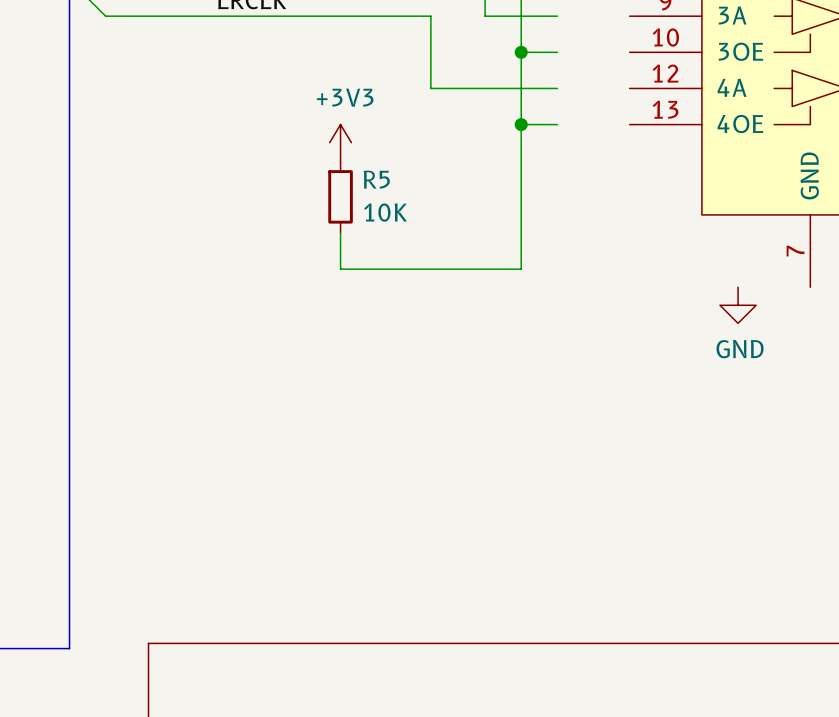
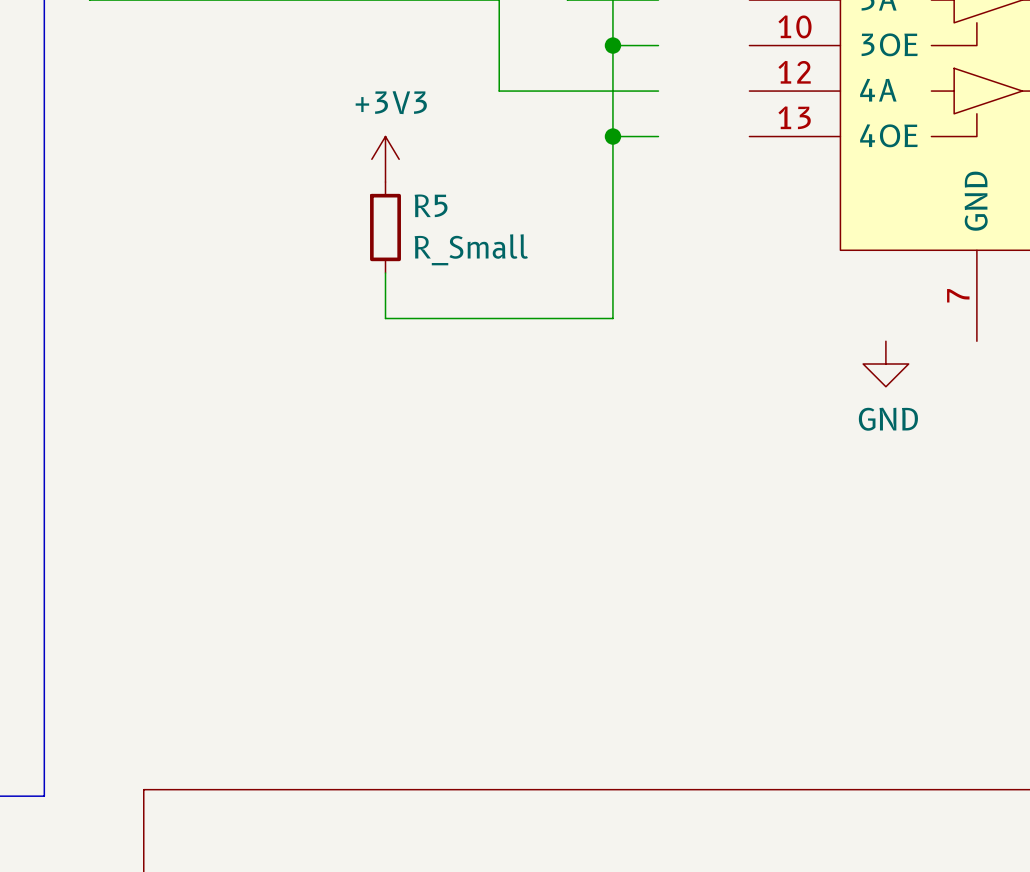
R5 value: 10K (385, 212) -> R_Small (471, 249)

